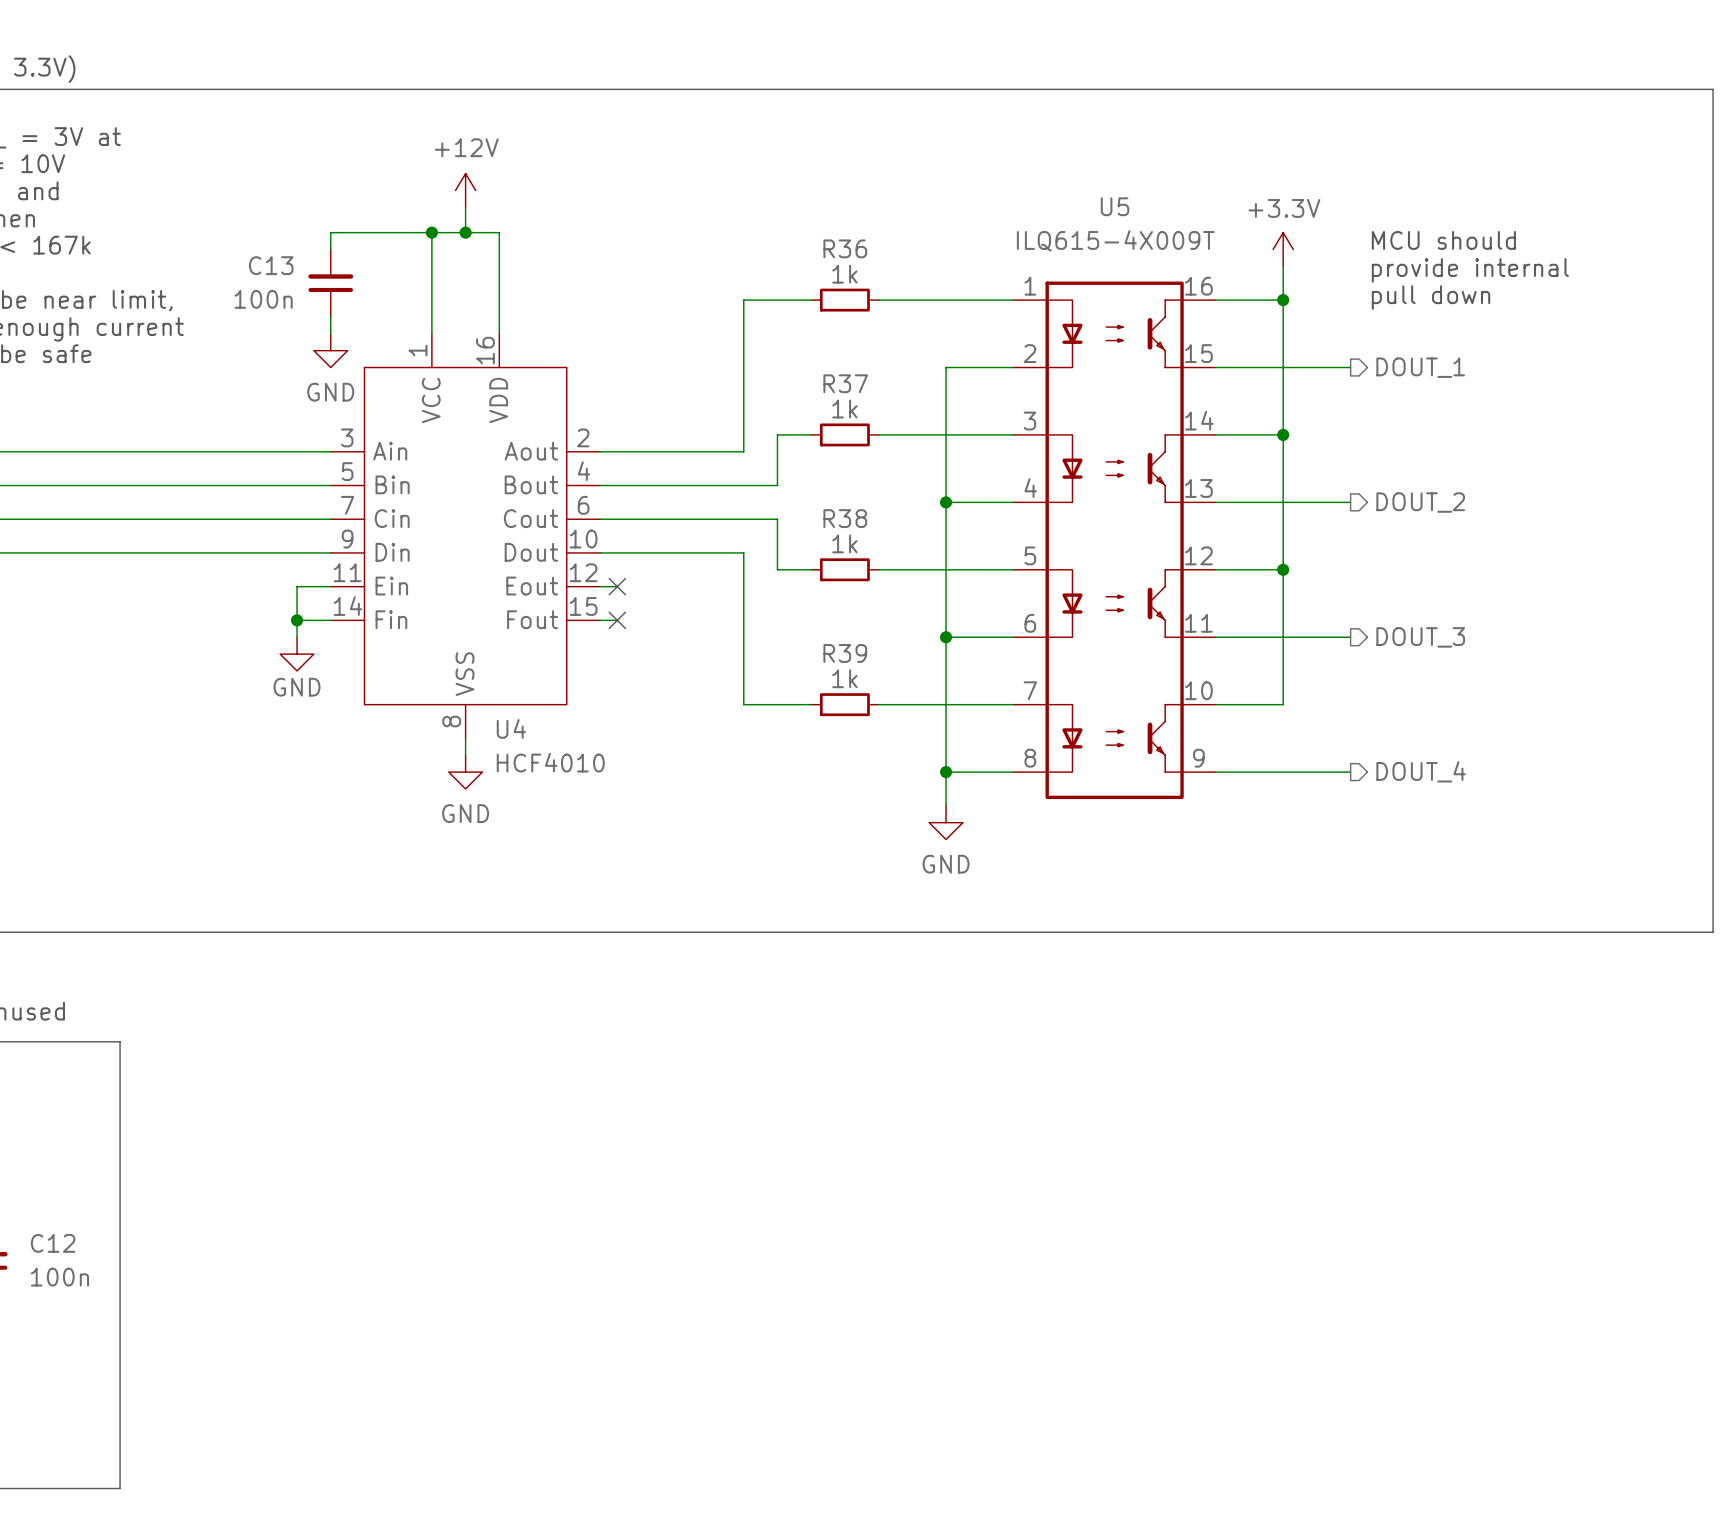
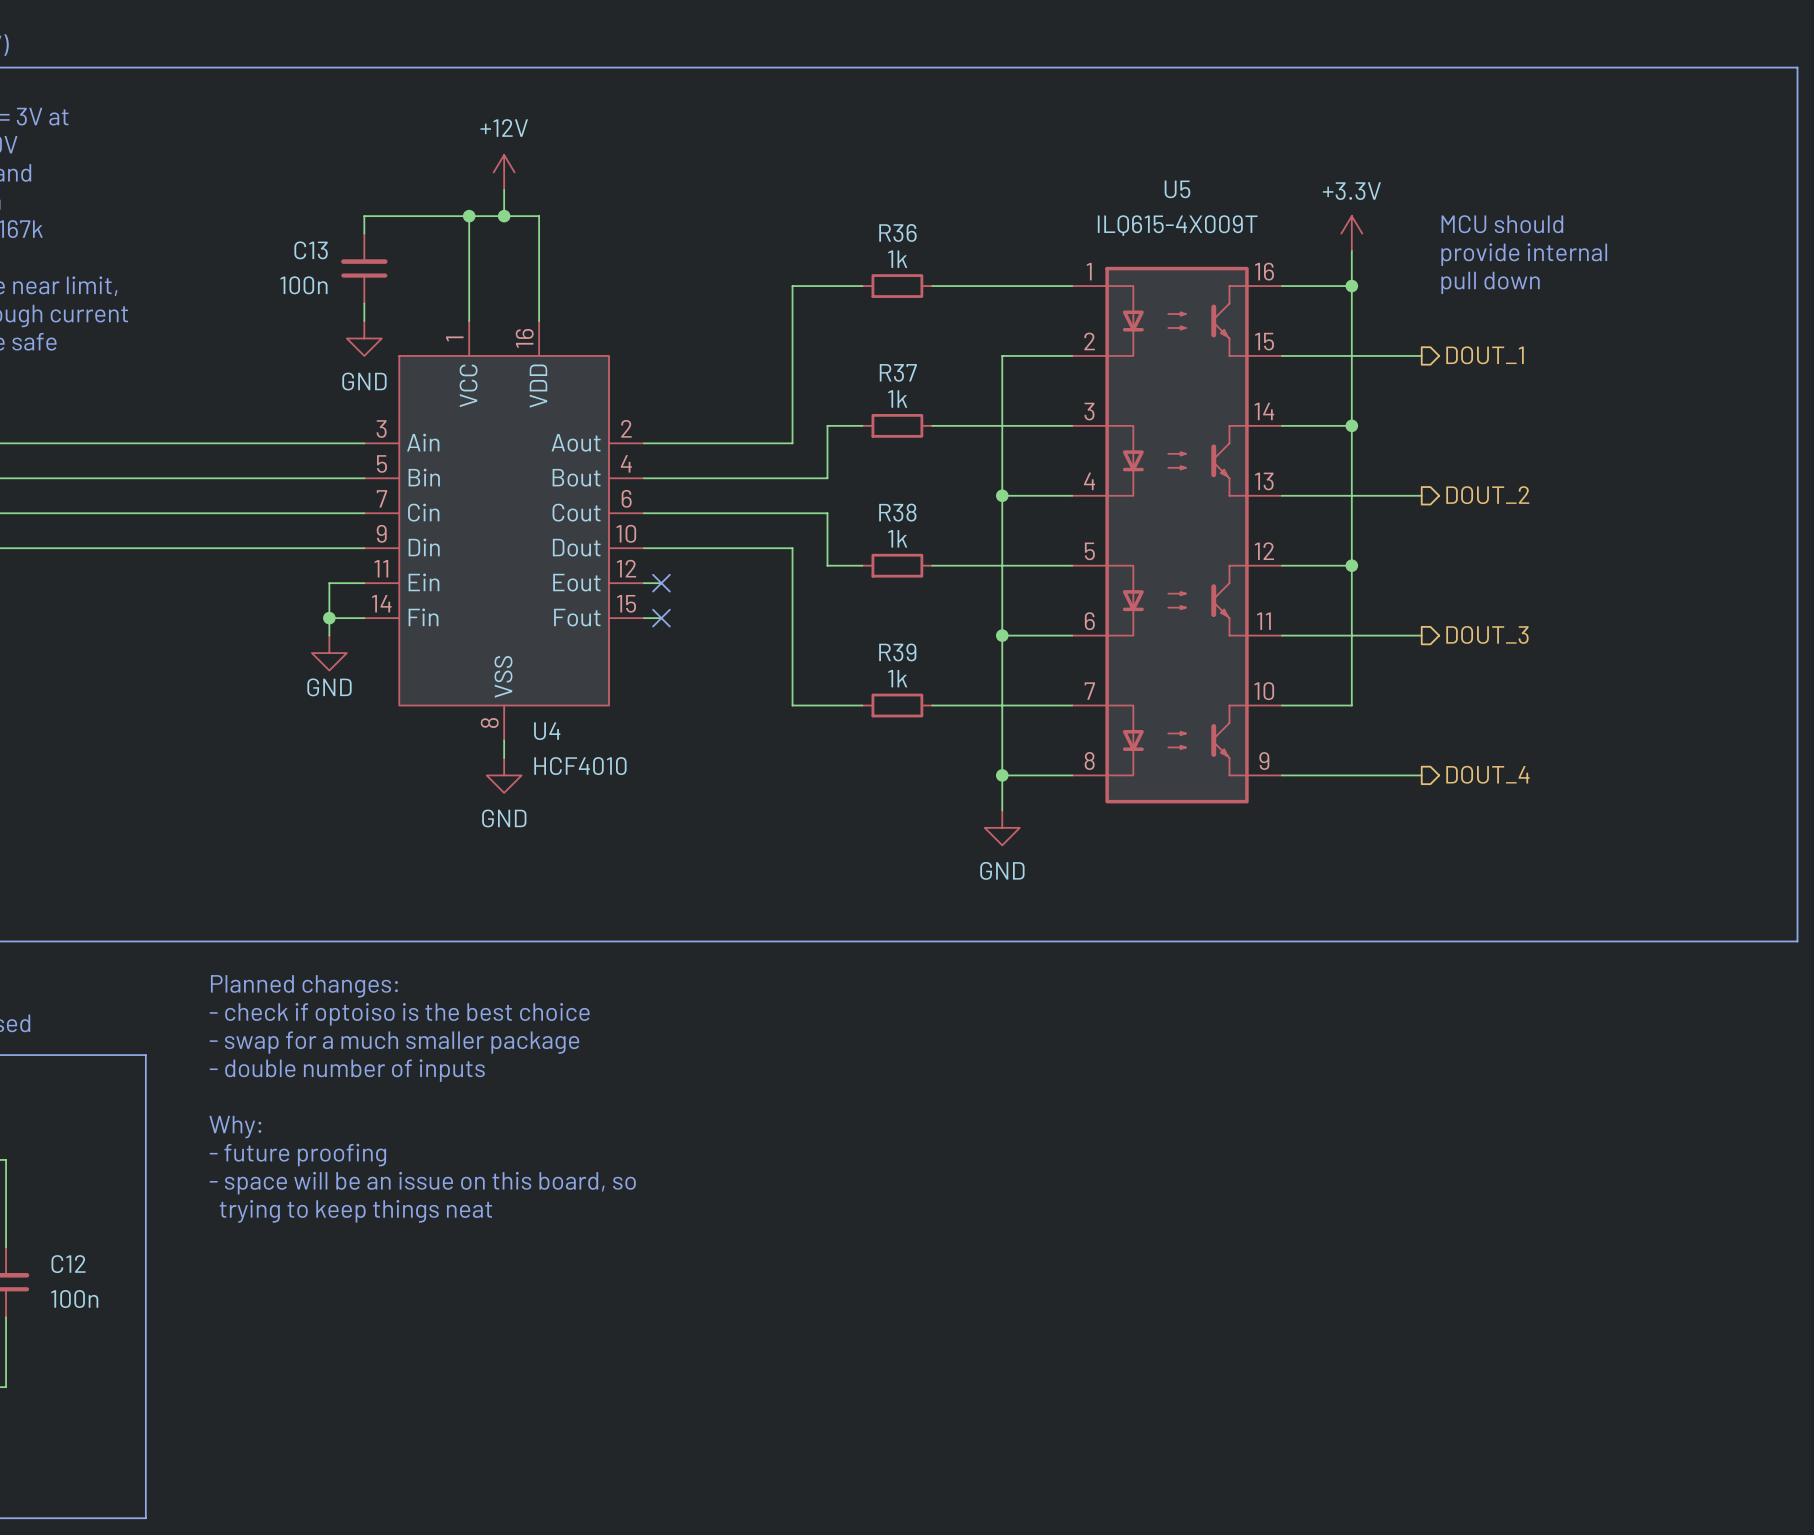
text: none -> Planned changes: (304, 986)
text: none -> - check if optoiso is the best choice (399, 1014)
text: none -> - swap for a much smaller package (394, 1042)
text: none -> - double number of inputs (347, 1070)
text: none -> Why: (235, 1127)
text: none -> - future proofing (297, 1155)
text: none -> - space will be an issue on this board, so (422, 1183)
text: none -> trying to keep things neat (355, 1211)

